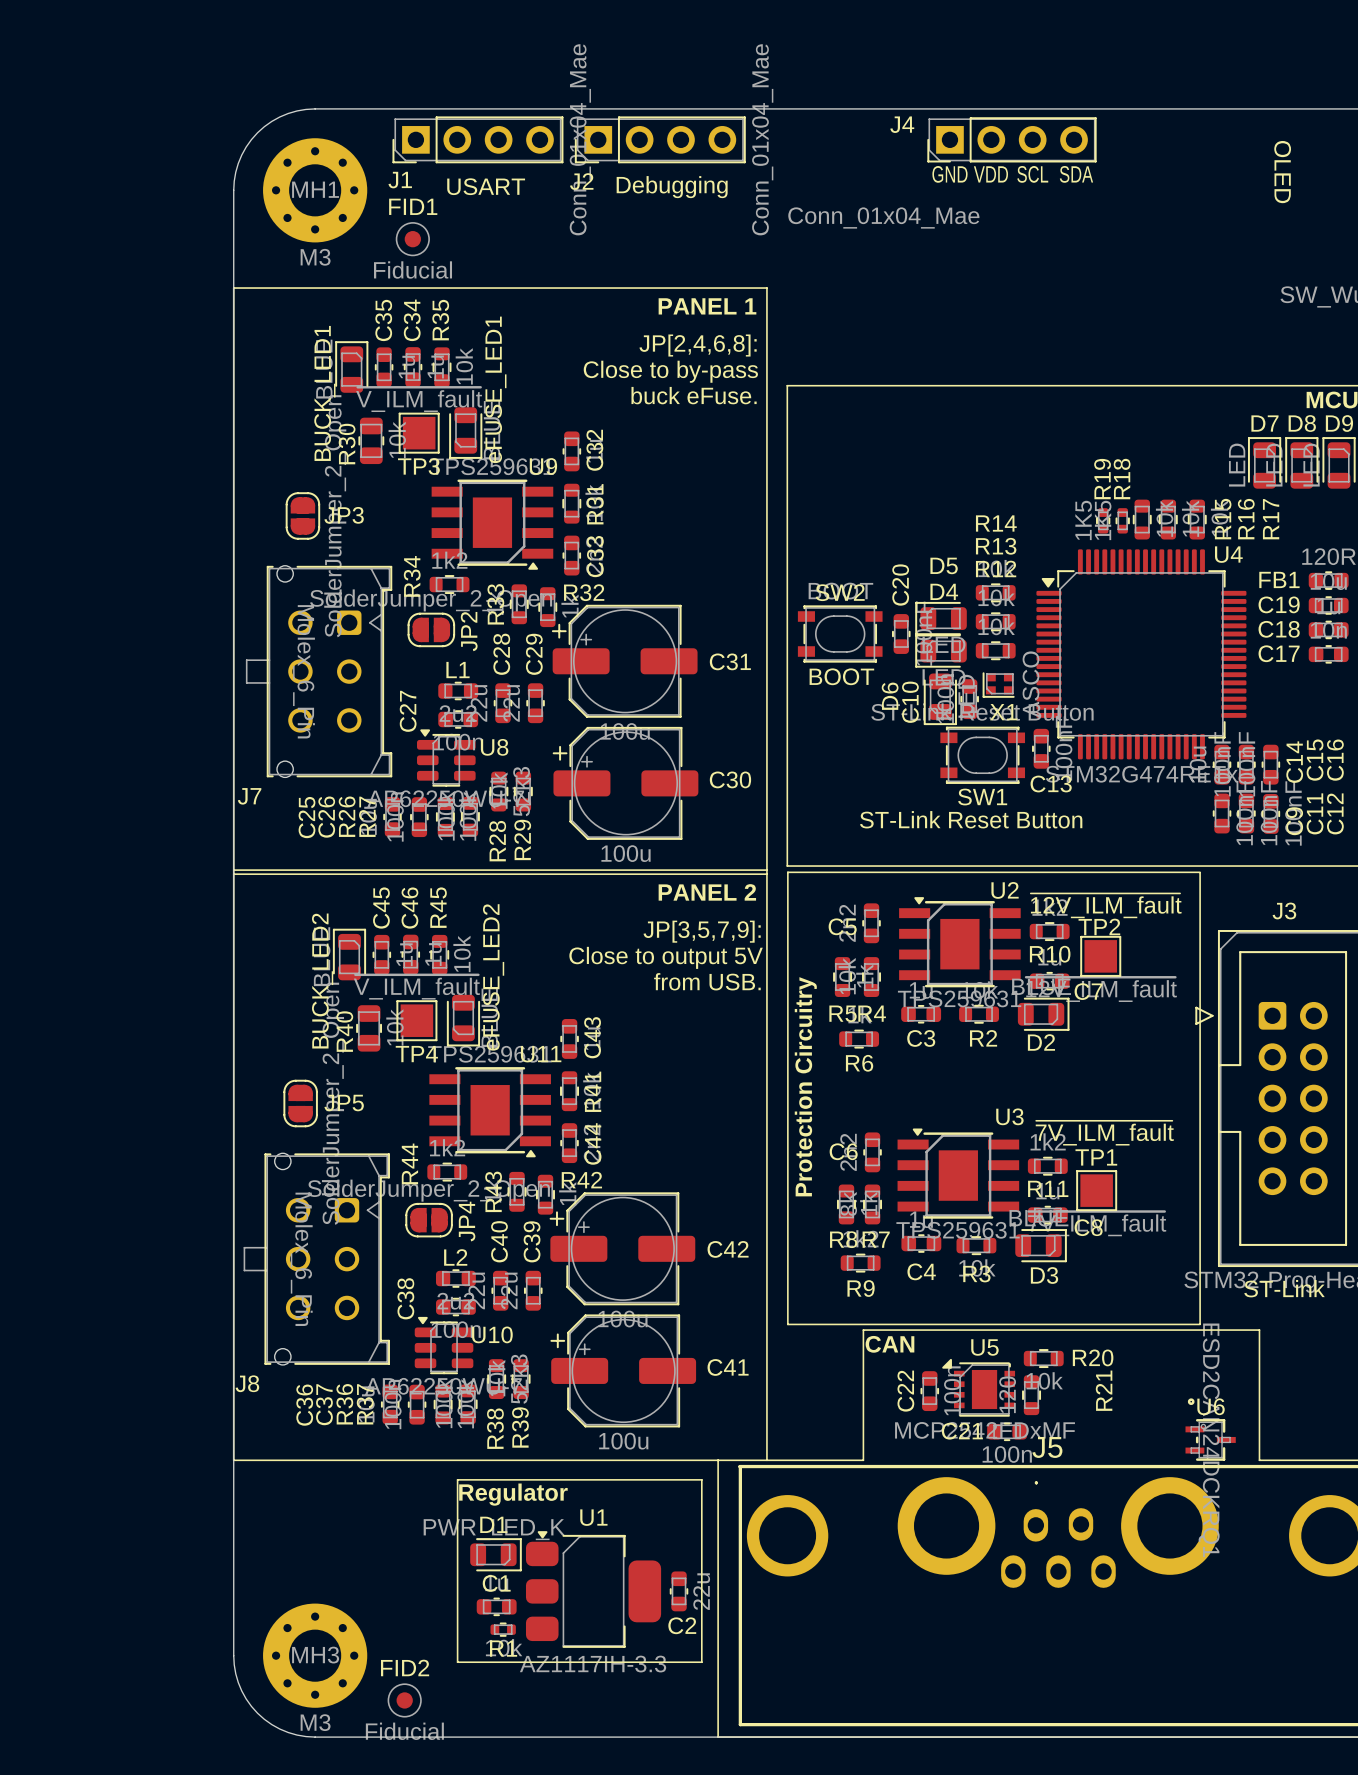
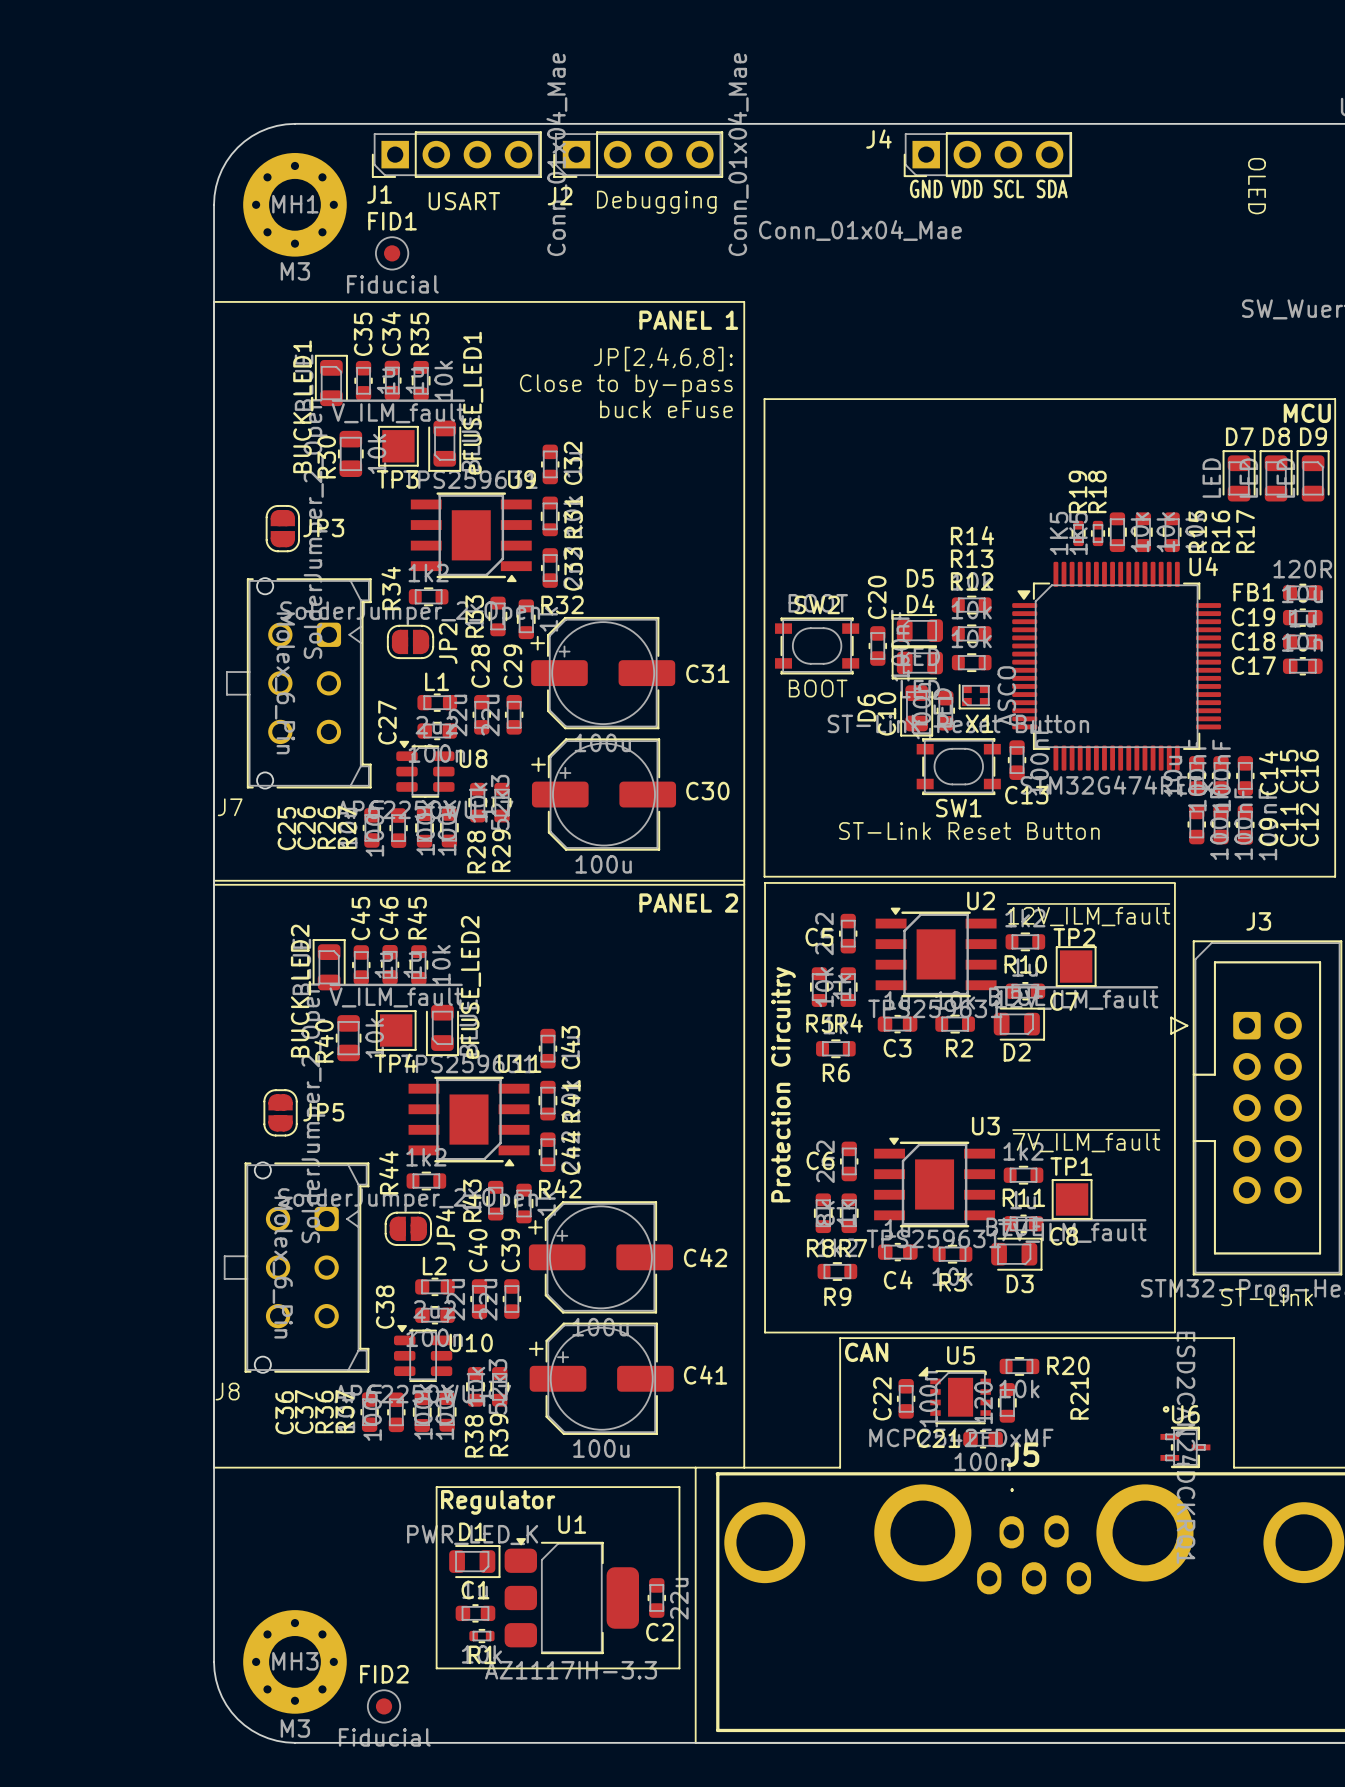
text: buck eFuse. (694, 395) -> buck eFuse (666, 409)
text: JP[3,5,7,9]: (702, 931) -> none
text: Close to output 5V (666, 957) -> none
text: from USB. (707, 981) -> none

